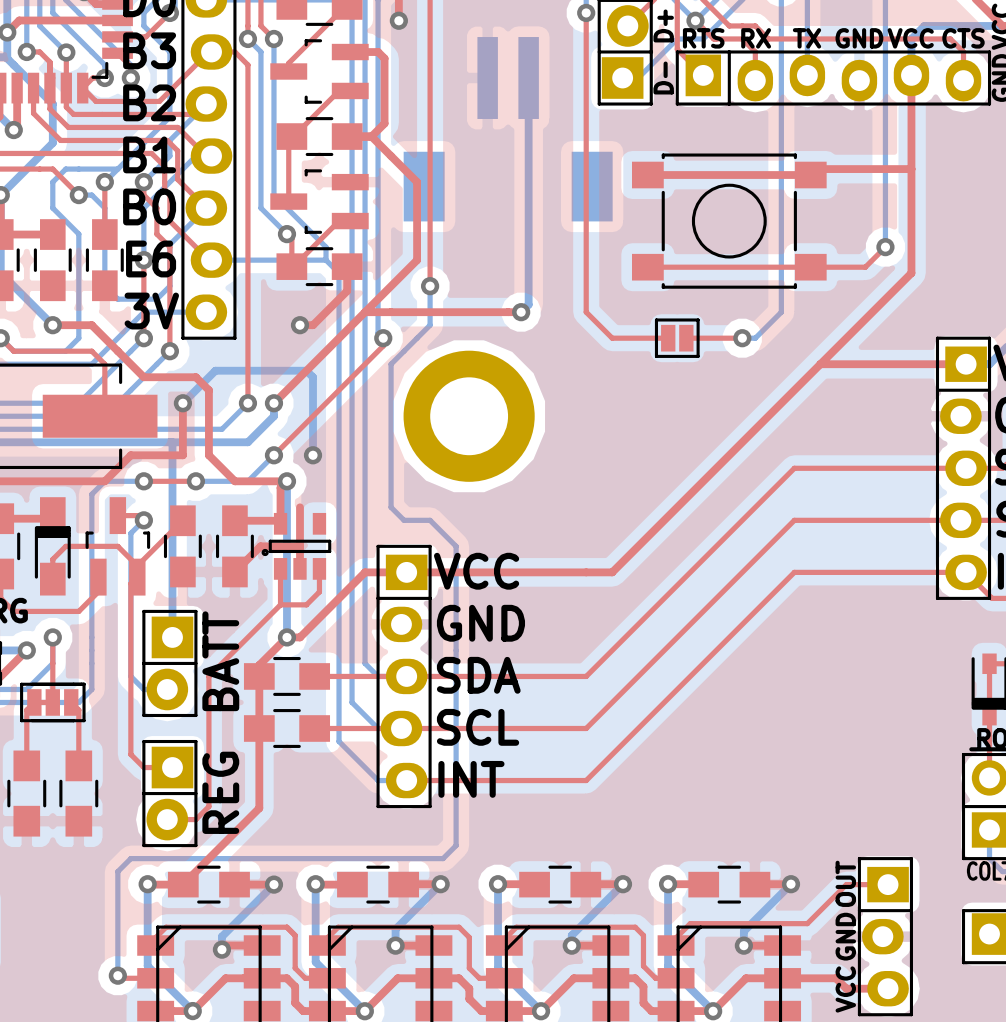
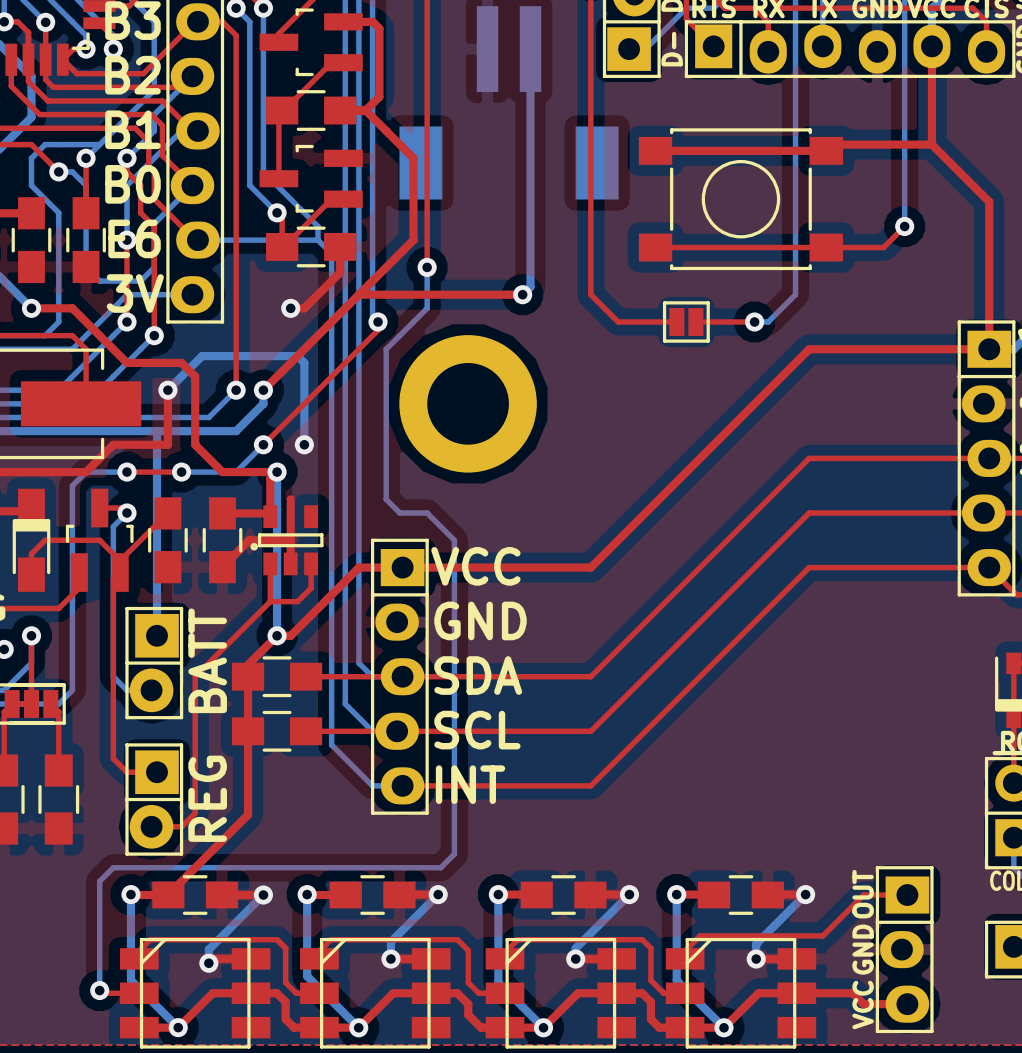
top track: (911, 169) (911, 273) (612, 572) (586, 572) -> (836, 349) (809, 349) (590, 567)
top track: none -> (931, 144) (989, 201) (989, 349)

